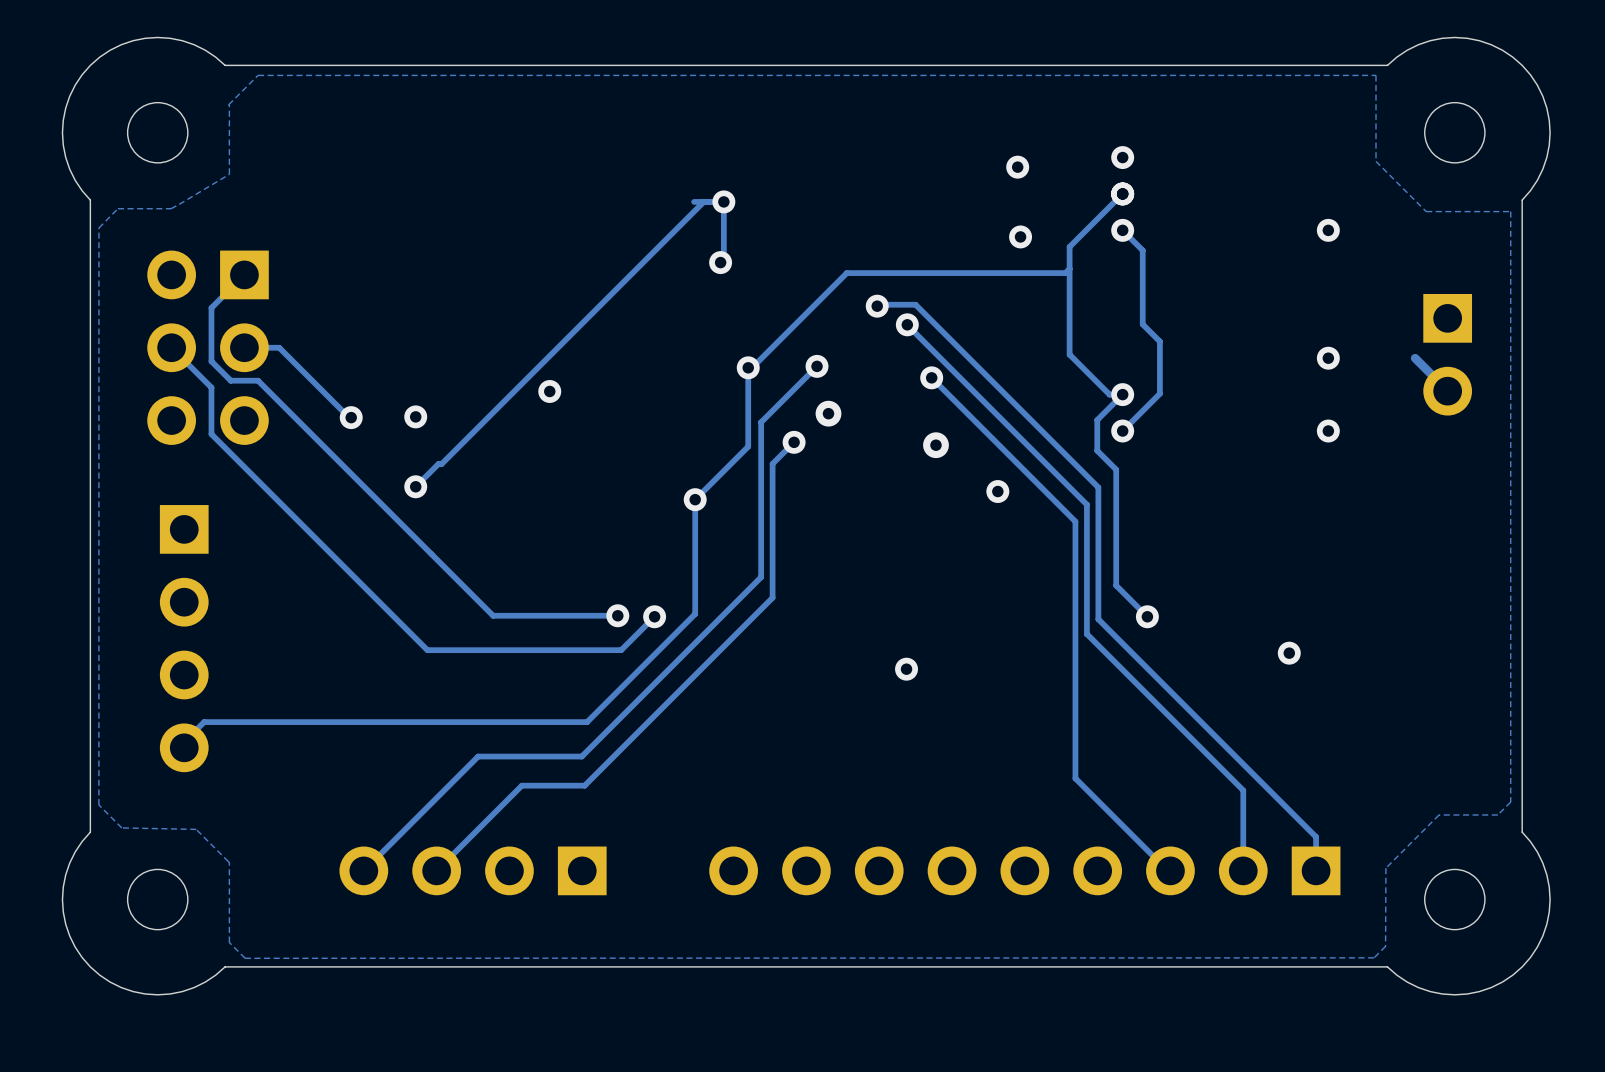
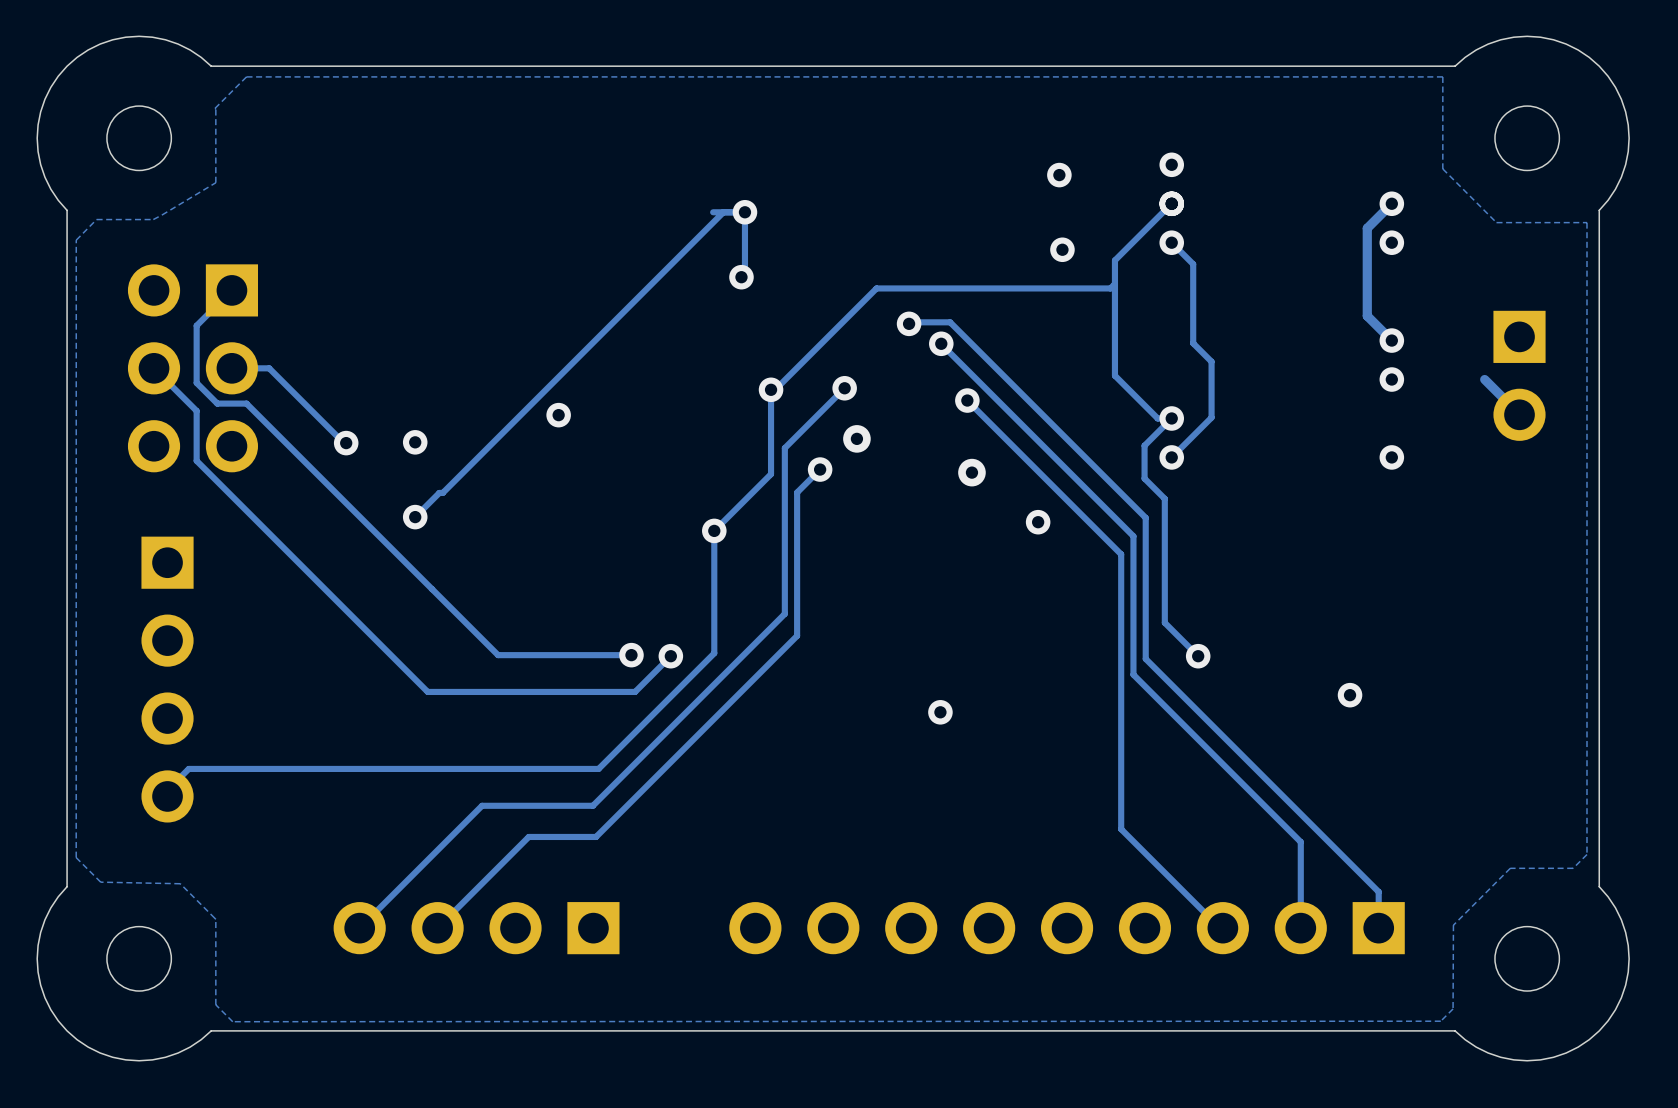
track: none -> (1391, 203) (1367, 228) (1367, 316) (1391, 340)
via: none -> (1391, 203)
via: none -> (1391, 340)

